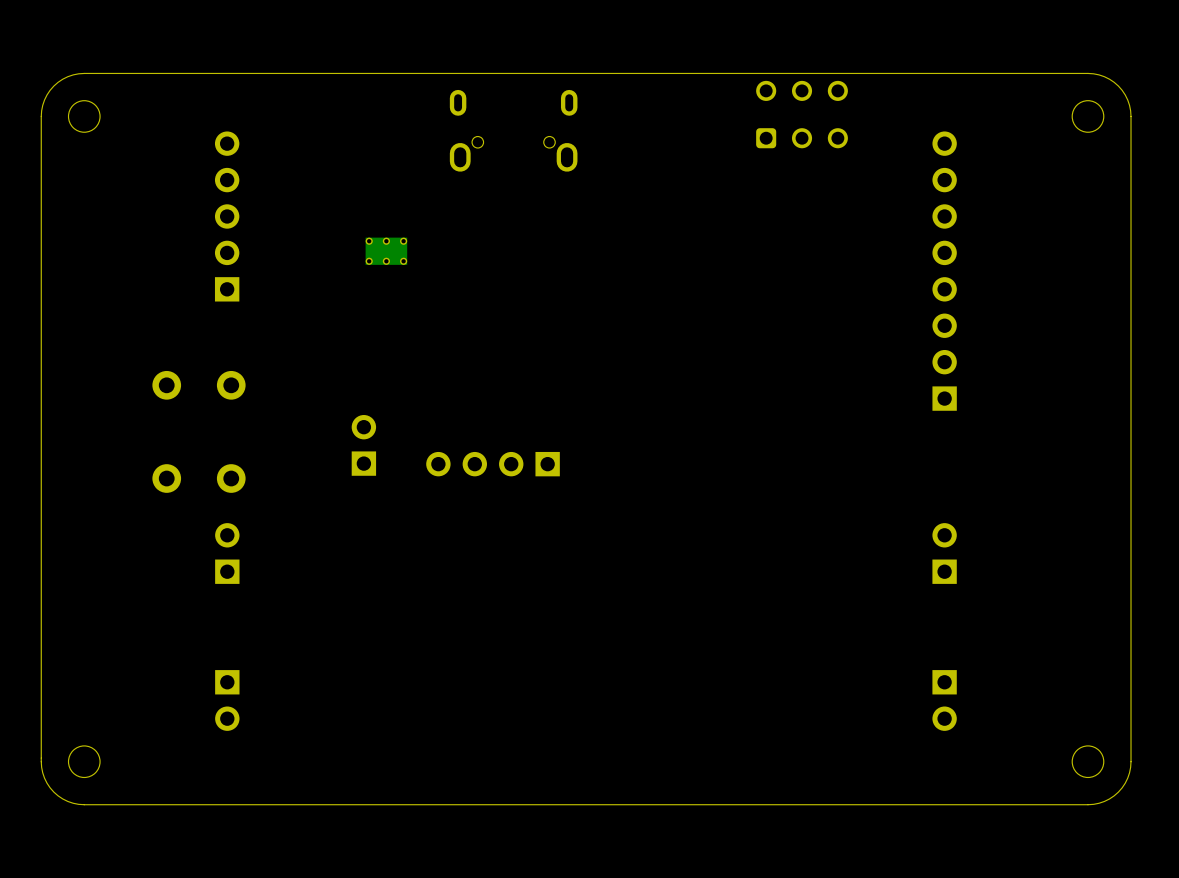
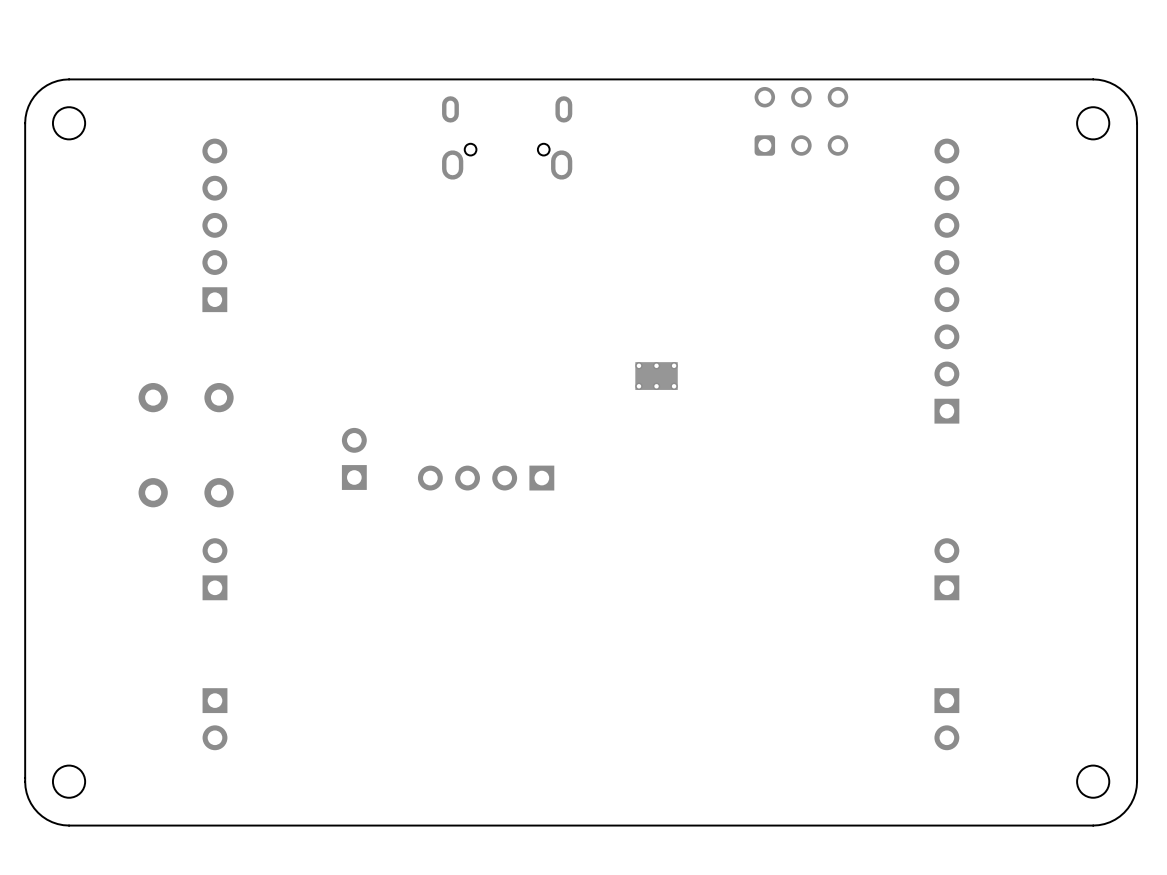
part position: (386, 251) -> (656, 376)

